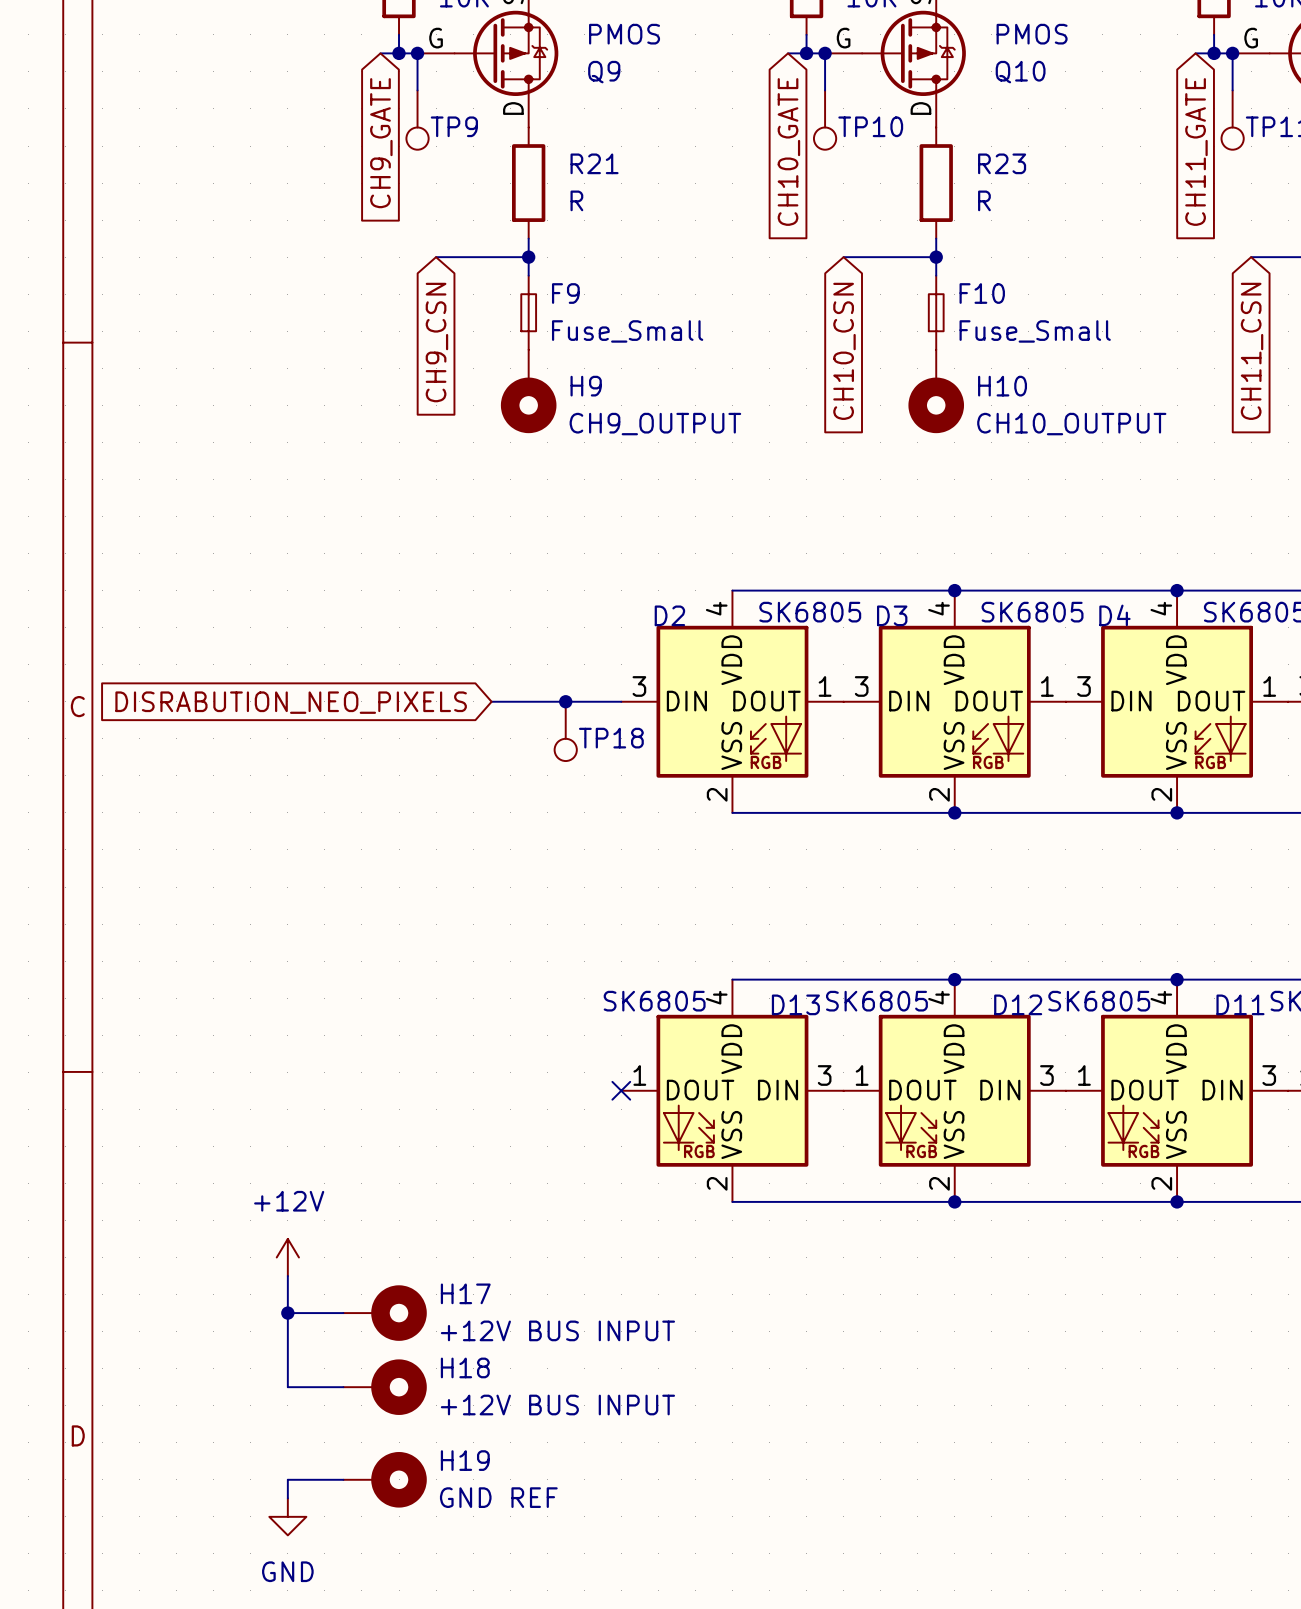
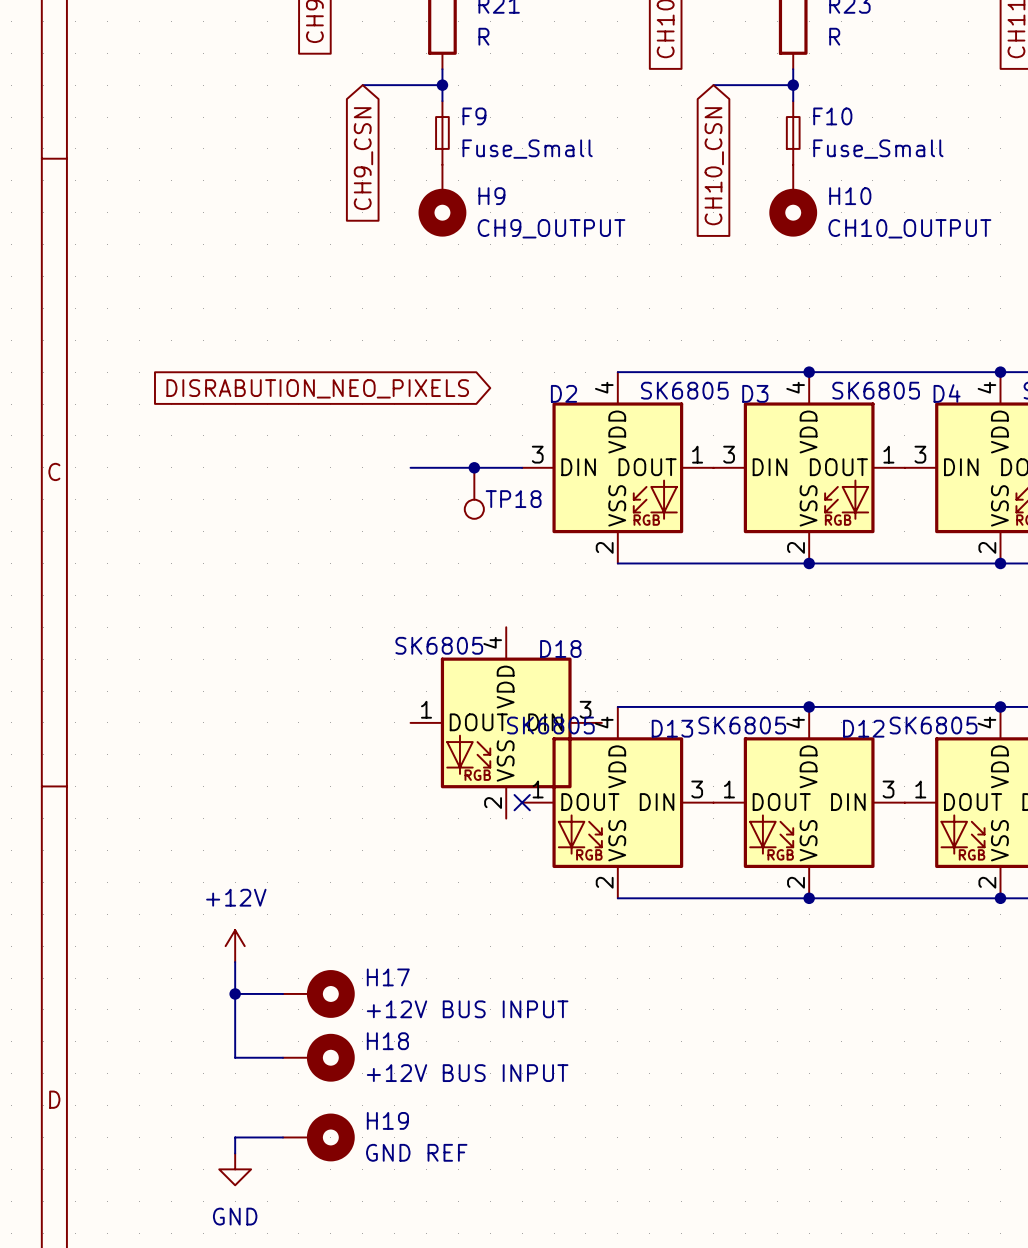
global label position: DISRABUTION_NEO_PIXELS (291, 702) -> DISRABUTION_NEO_PIXELS (317, 388)
D18: none -> SK6805 (506, 722)

